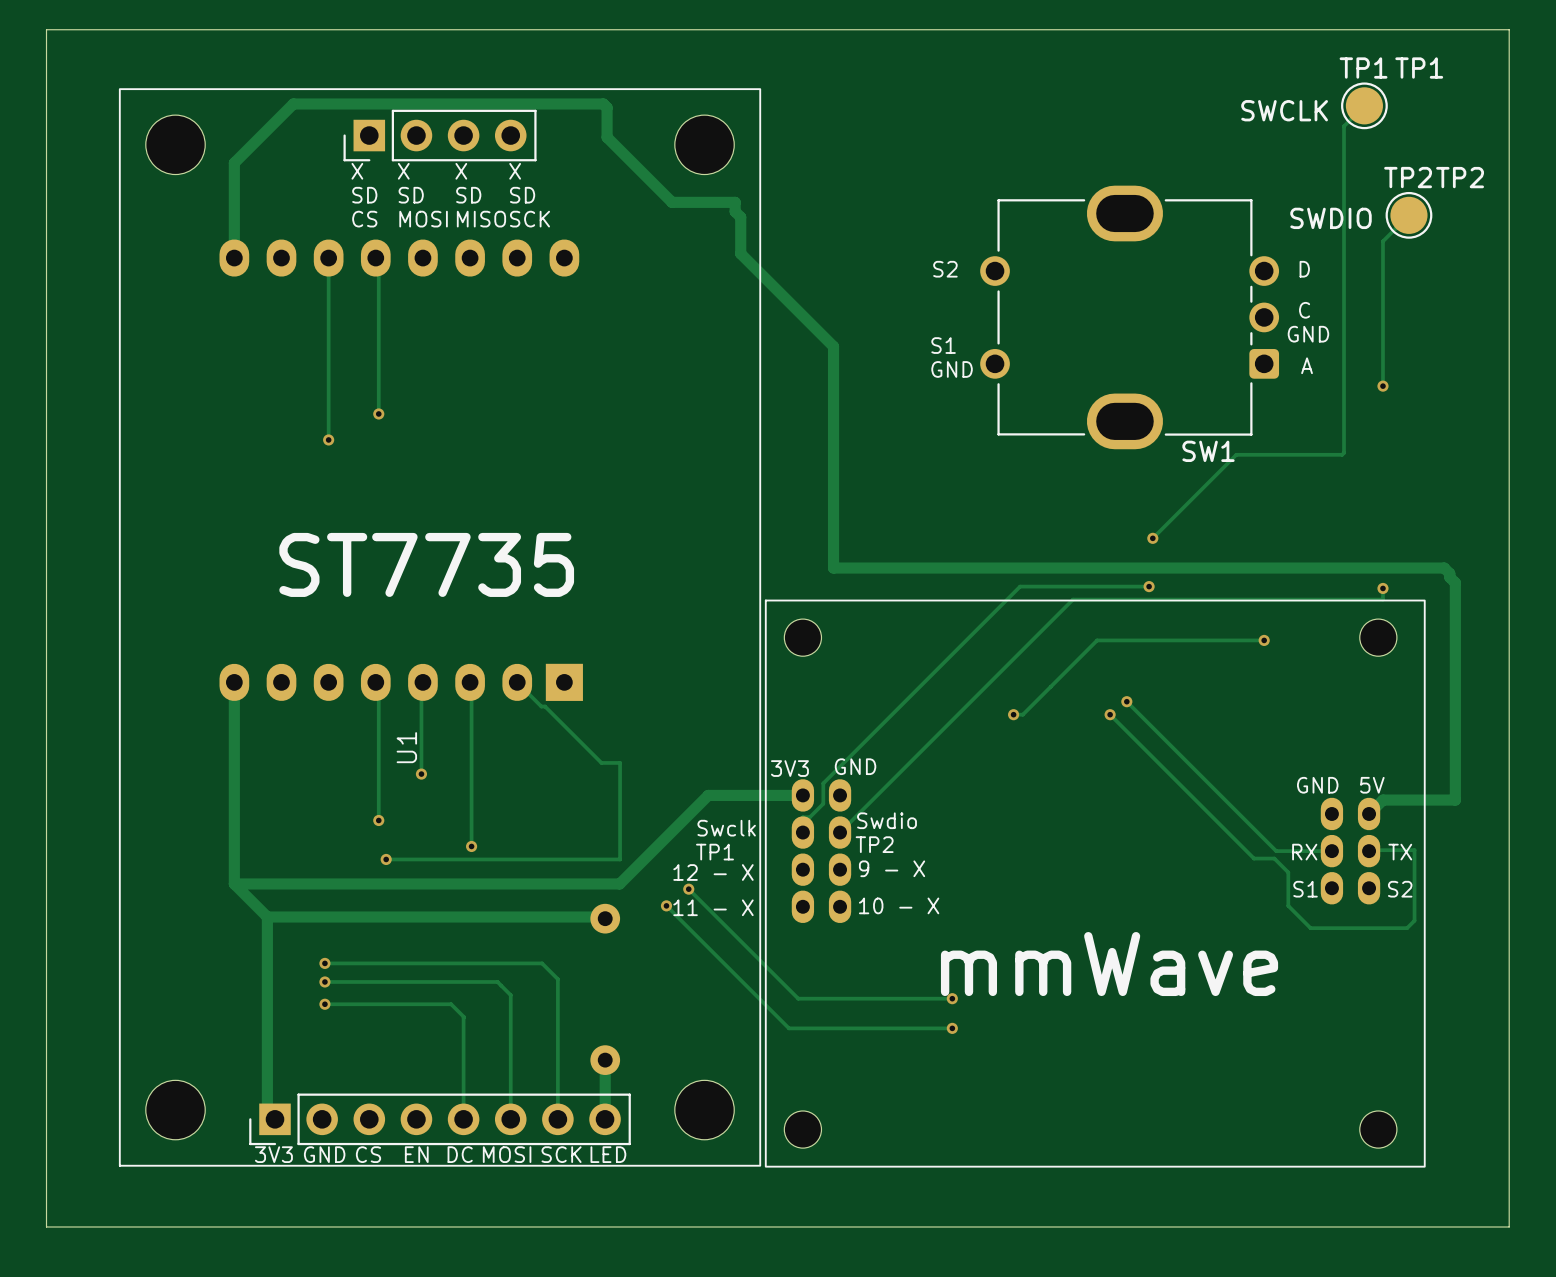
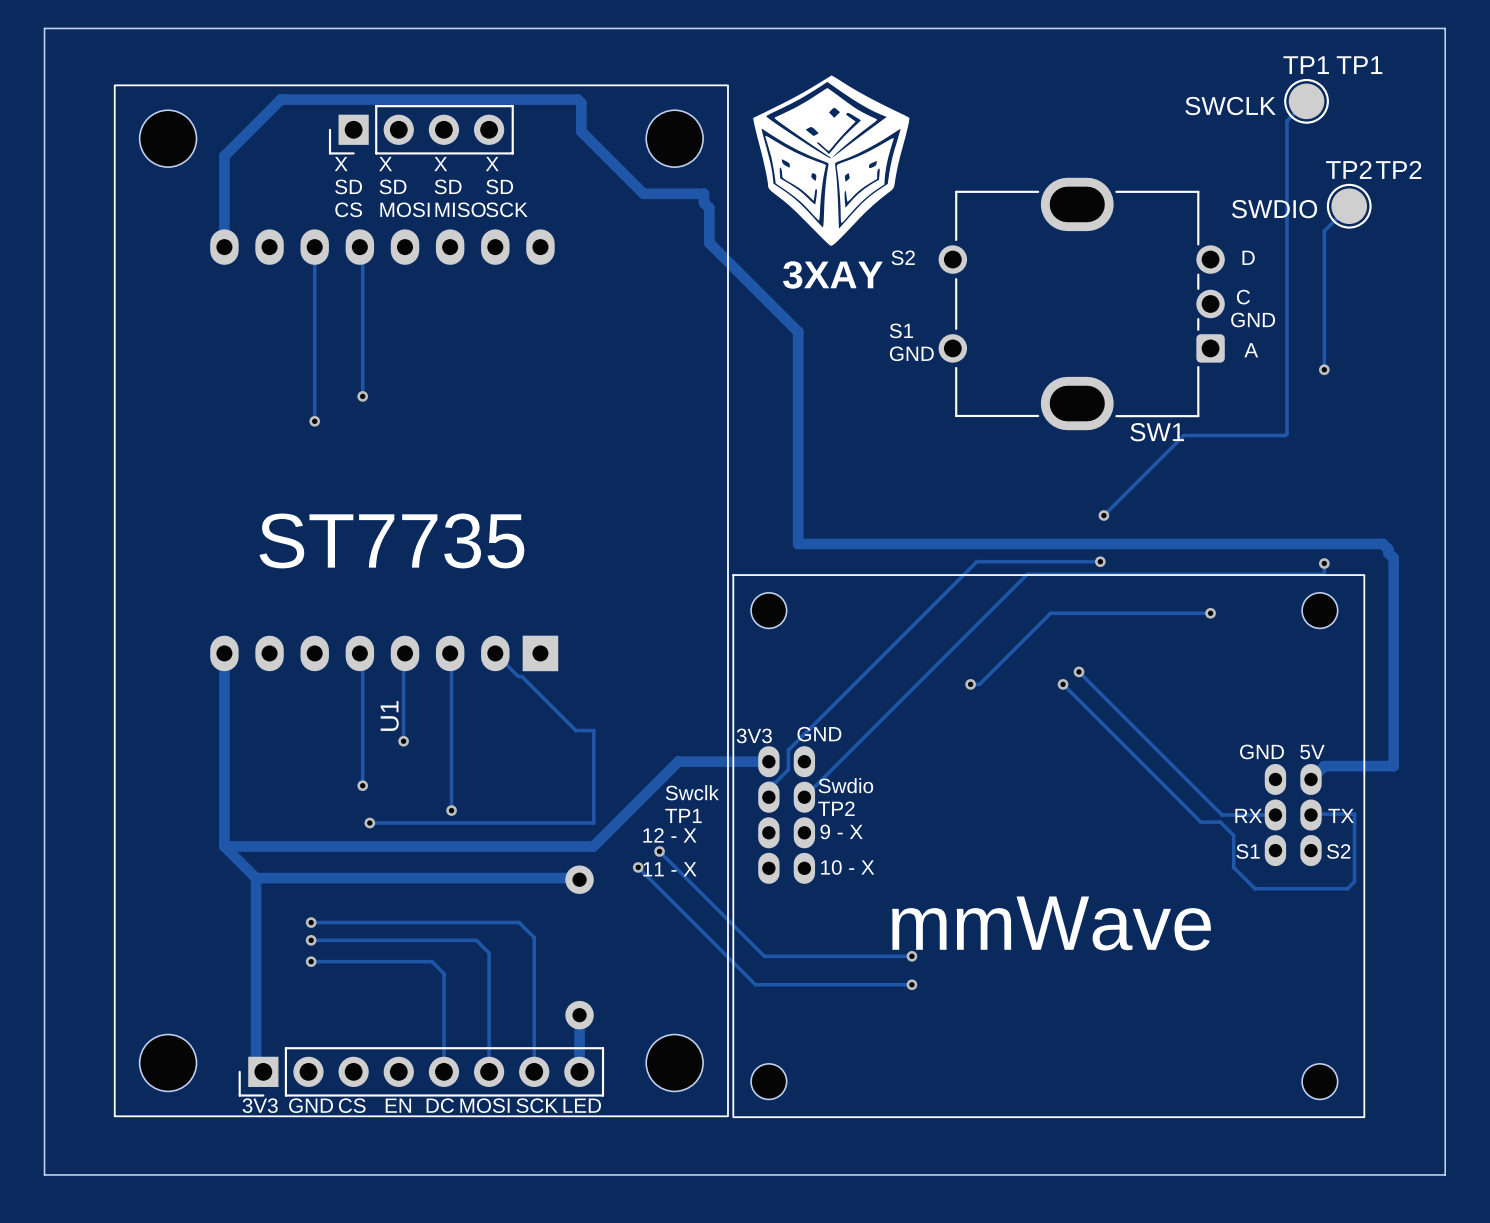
drawing: none -> [753, 75, 910, 246]
text: none -> 3XAY (832, 274)

